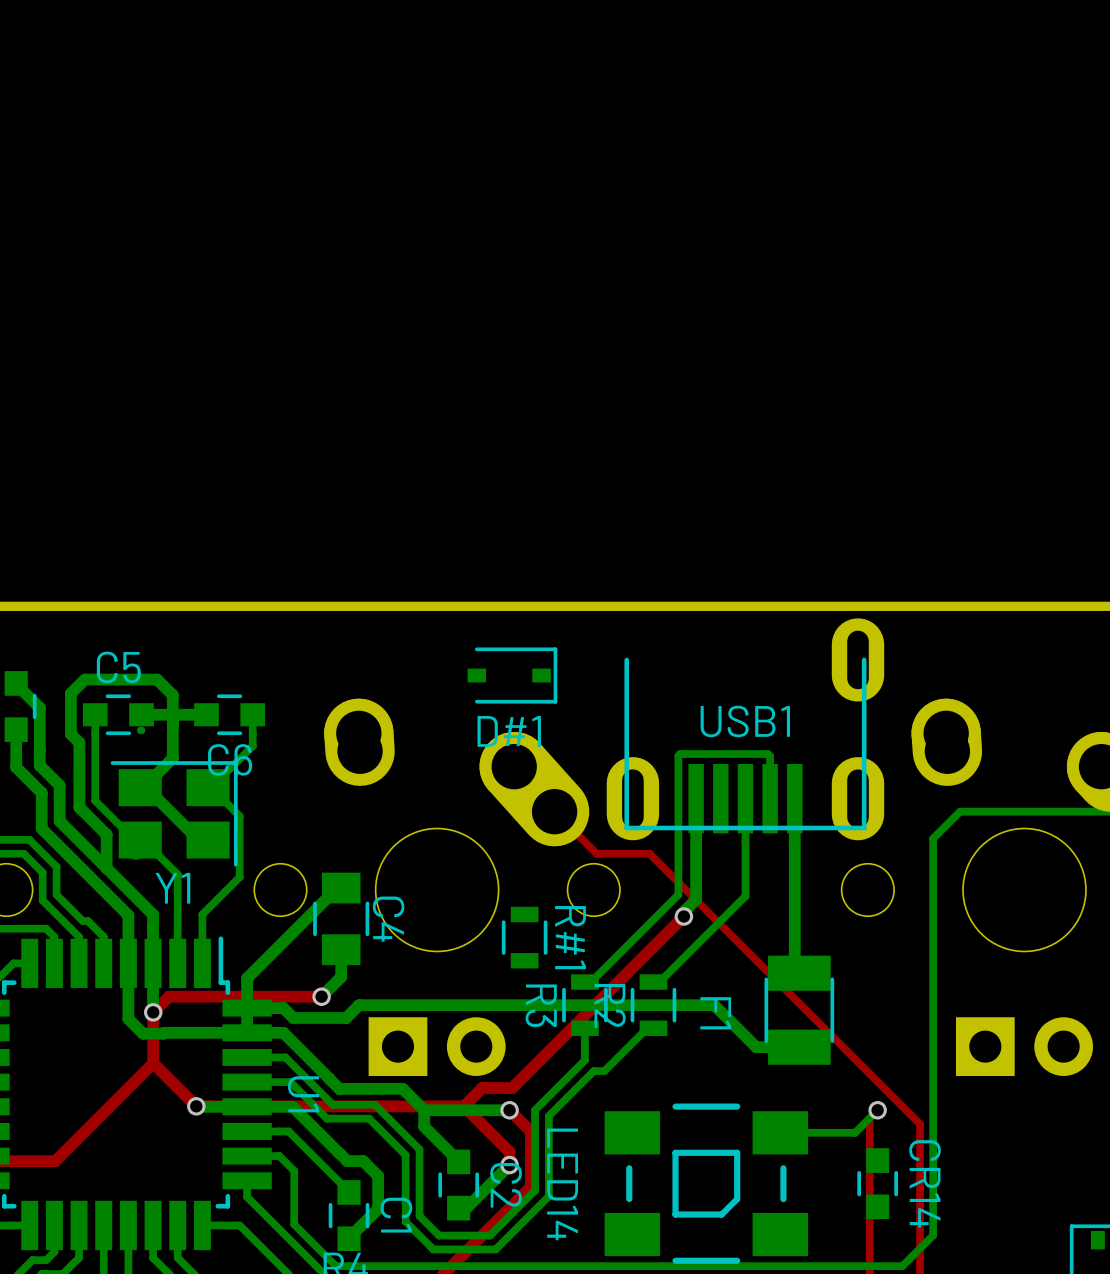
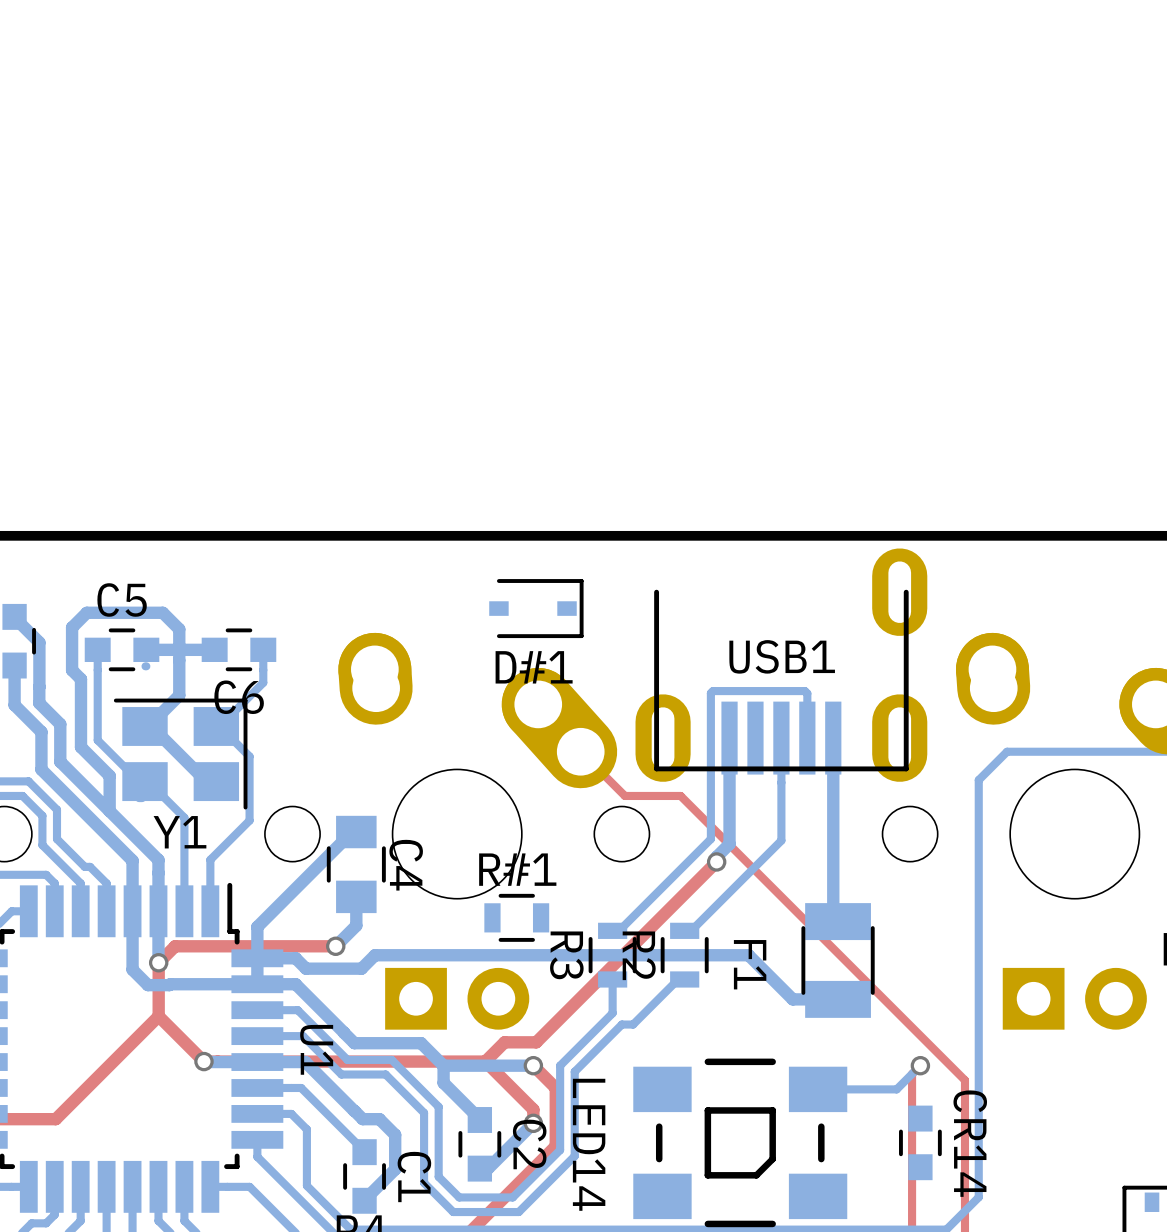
R#1 rotation: 0° (524, 937) -> 90° clockwise (516, 917)
R#1 position: (524, 937) -> (516, 917)
R#1 name position: R#1 (570, 937) -> R#1 (517, 869)

